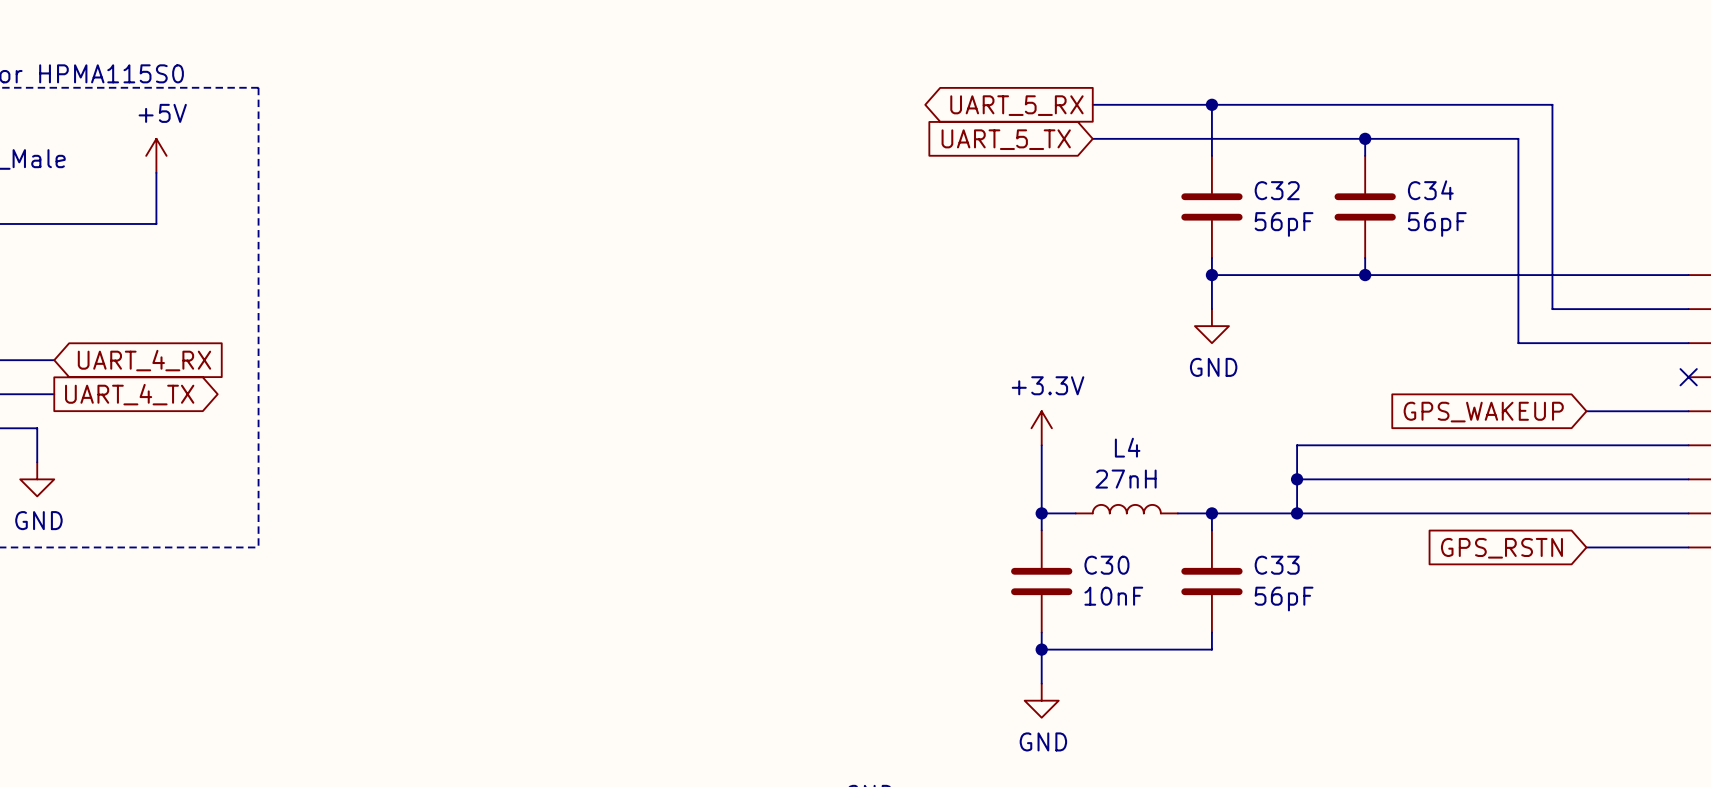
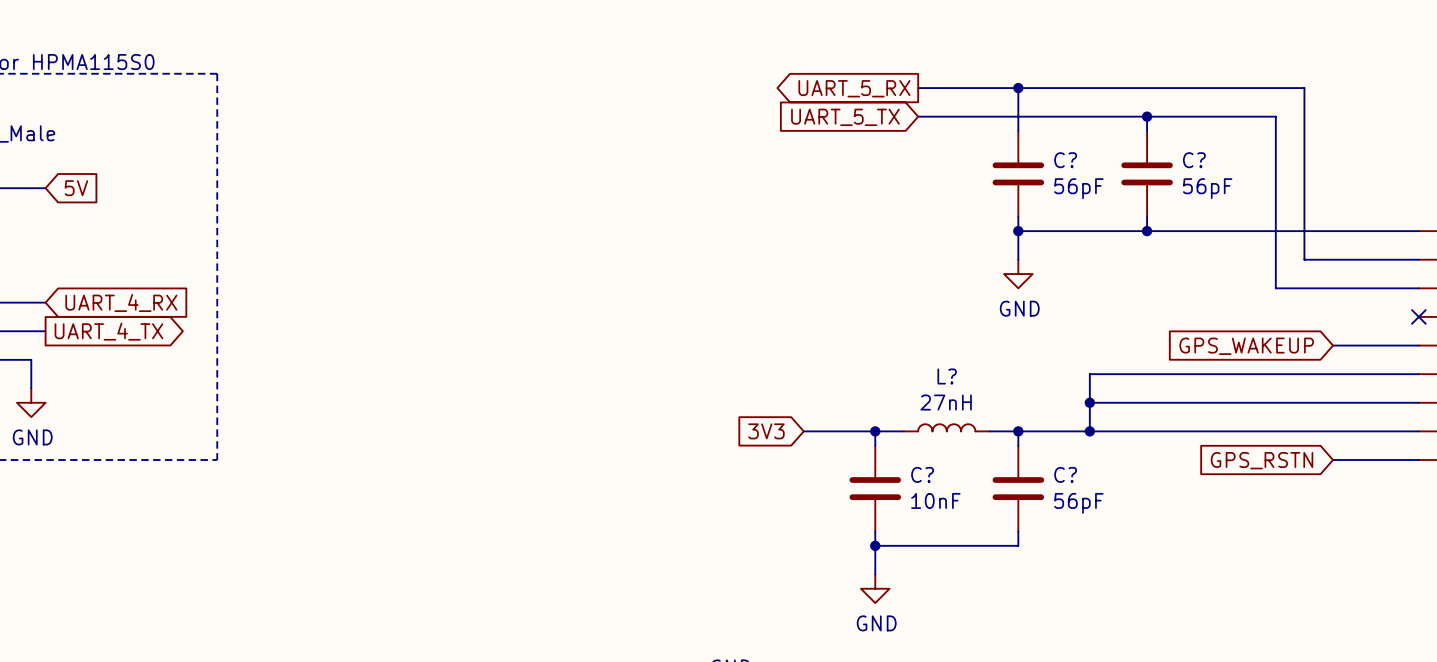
power symbol: +5V (156, 155) -> none
wire: (156, 172) (156, 223) (54, 223) -> none
C32 name: C32 (1277, 190) -> C? (1065, 160)
C34 name: C34 (1430, 190) -> C? (1194, 160)
global label: none -> 5V (76, 188)
power symbol: +3.3V (1041, 428) -> none
wire: (1041, 445) (1041, 513) -> (803, 431) (875, 431)
L4 name: L4 (1127, 447) -> L? (947, 376)
global label: none -> 3V3 (766, 431)
C30 name: C30 (1106, 565) -> C? (922, 474)
C33 name: C33 (1277, 565) -> C? (1065, 474)

